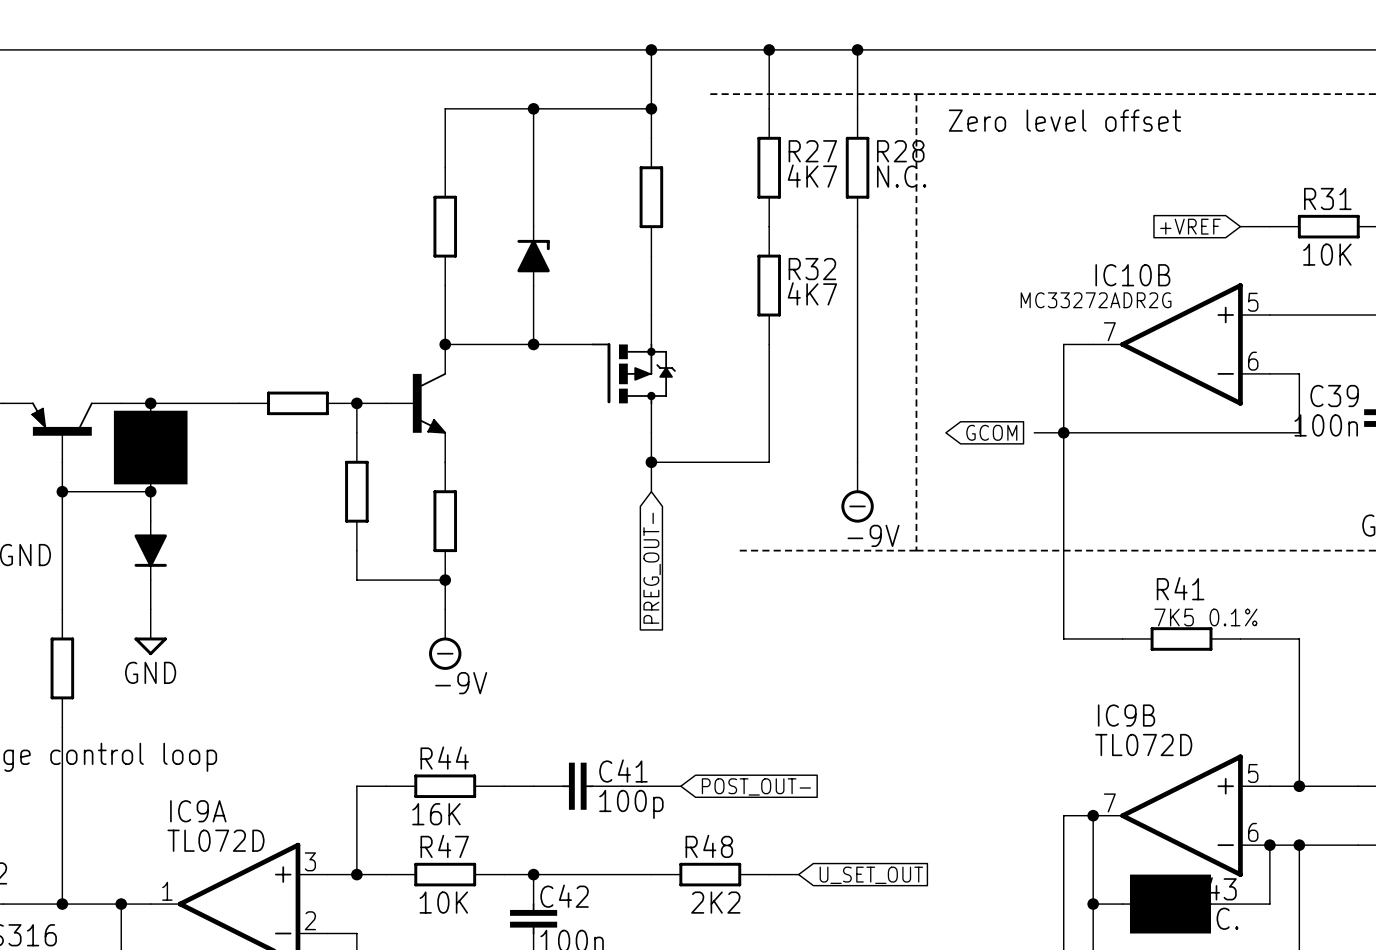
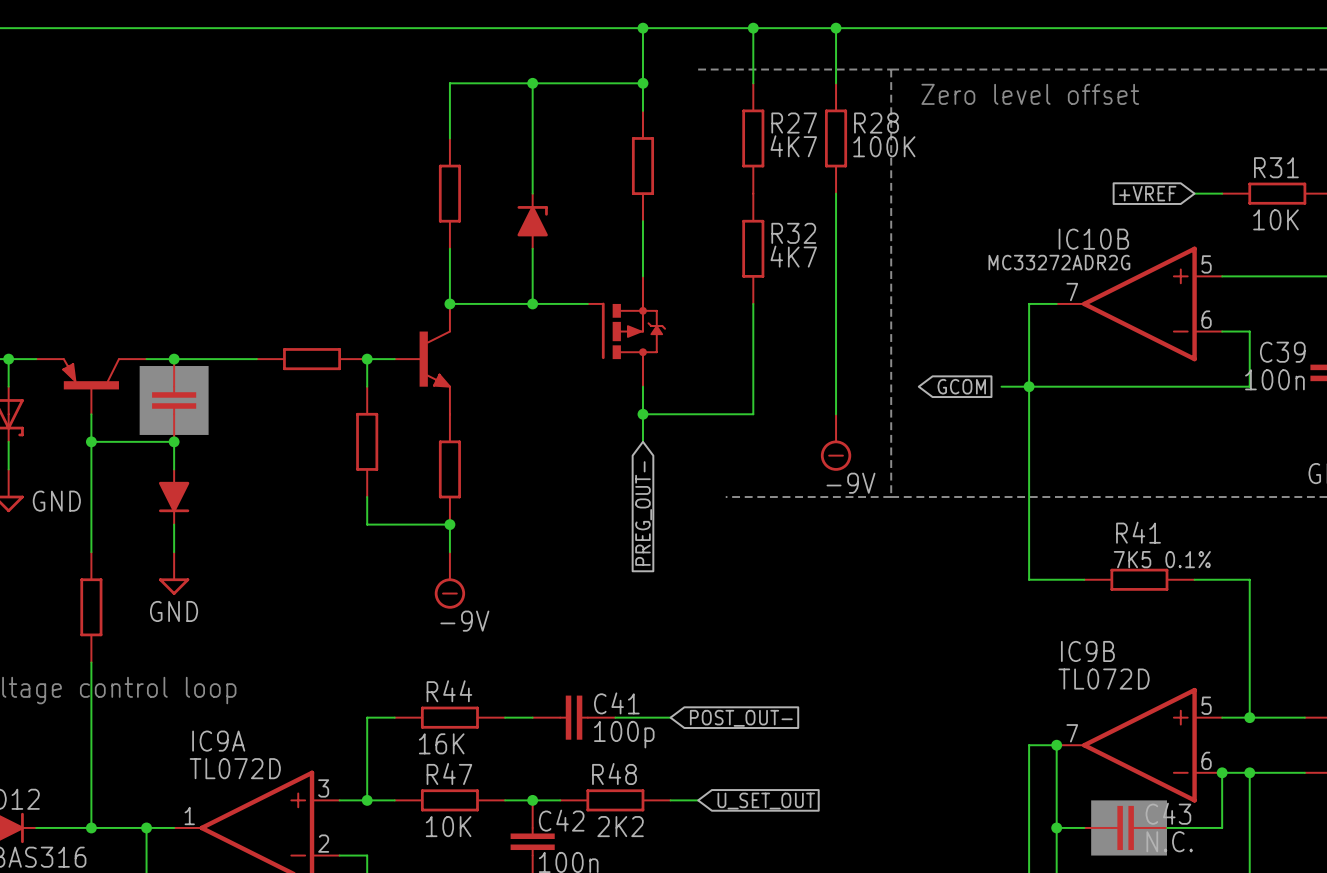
R28 value: N.C. (901, 176) -> 100K (884, 146)
wire: (563, 874) (651, 874) -> none
R48 position: (710, 874) -> (615, 800)
wire: (769, 874) (798, 874) -> (670, 800) (698, 800)
global label position: U_SET_OUT (871, 875) -> U_SET_OUT (766, 801)

